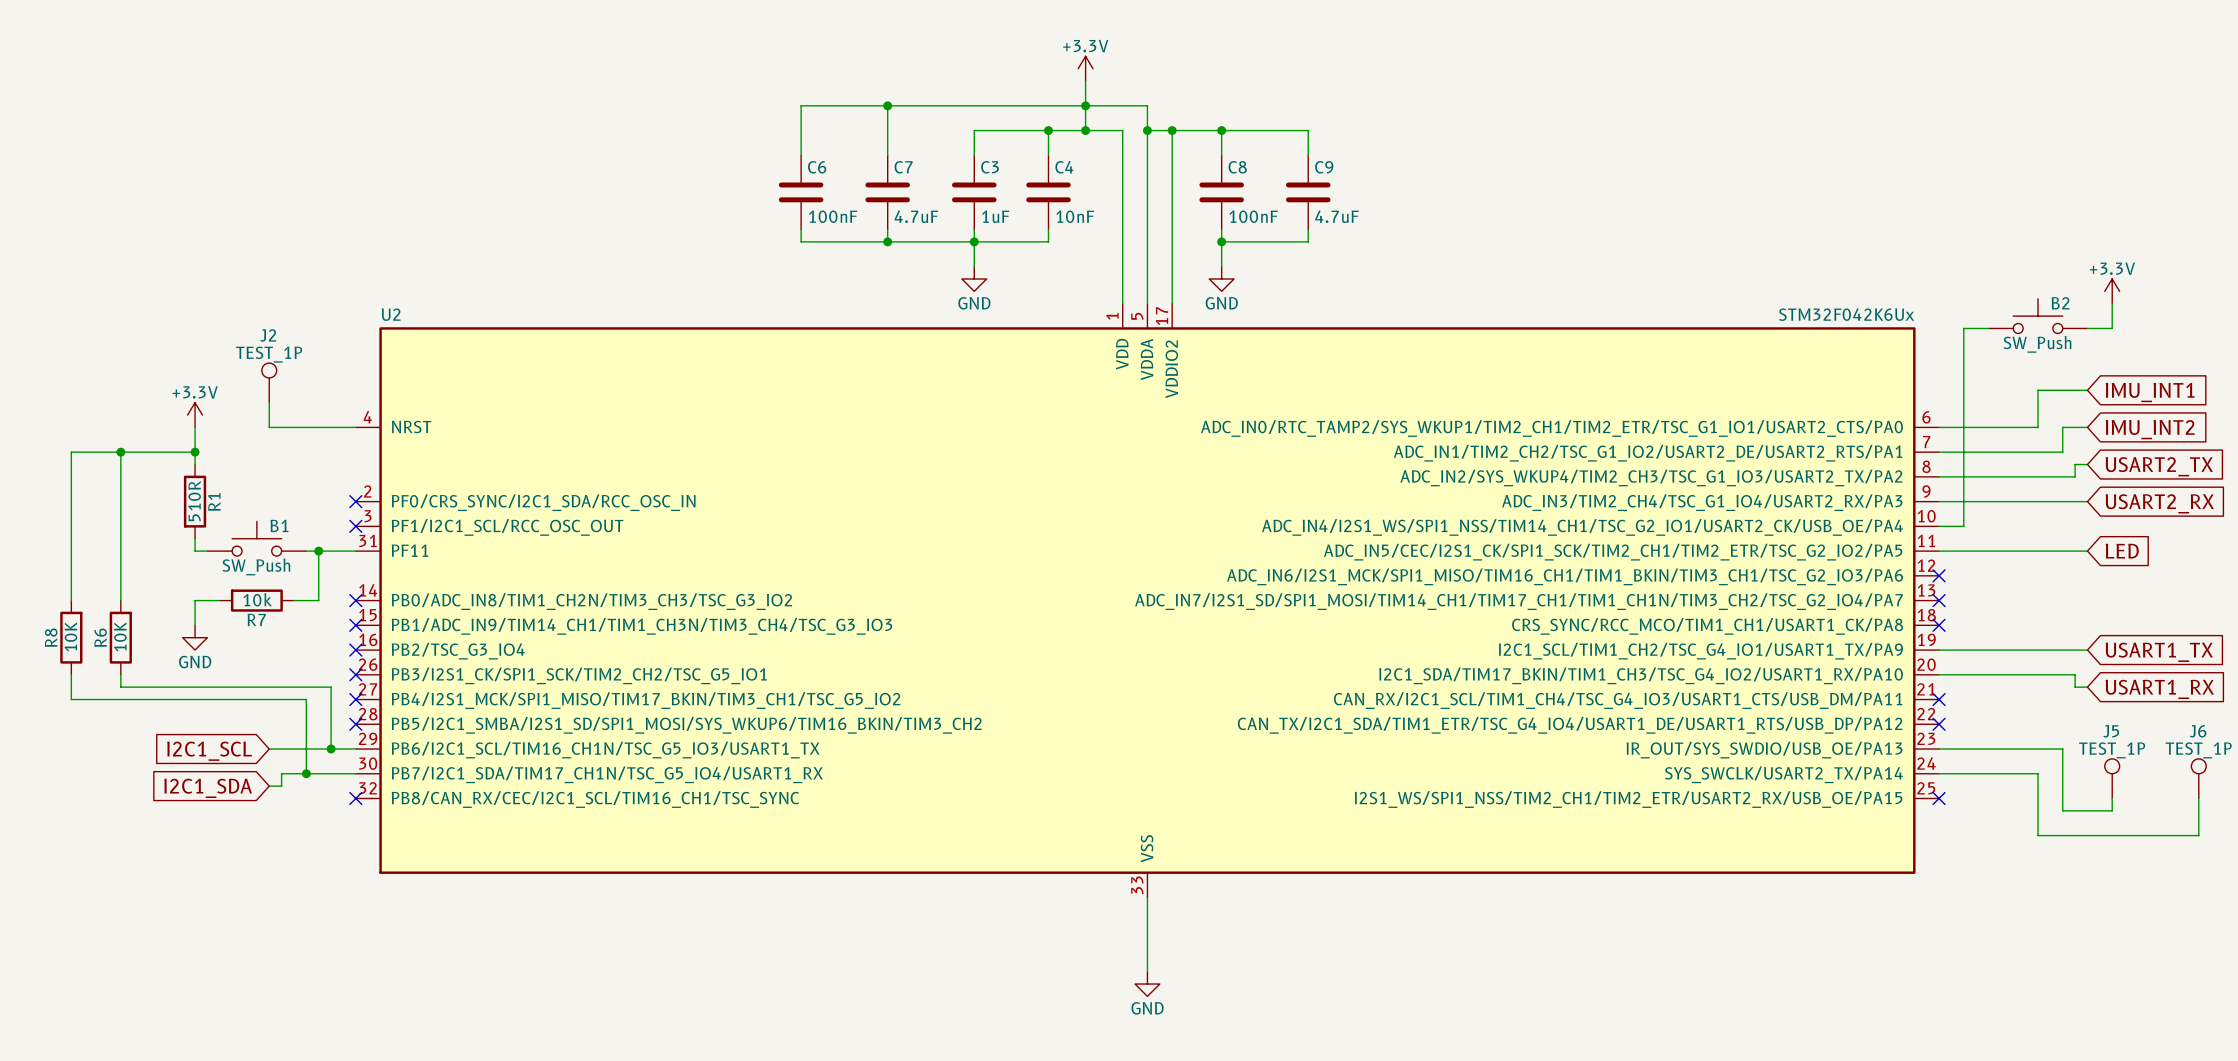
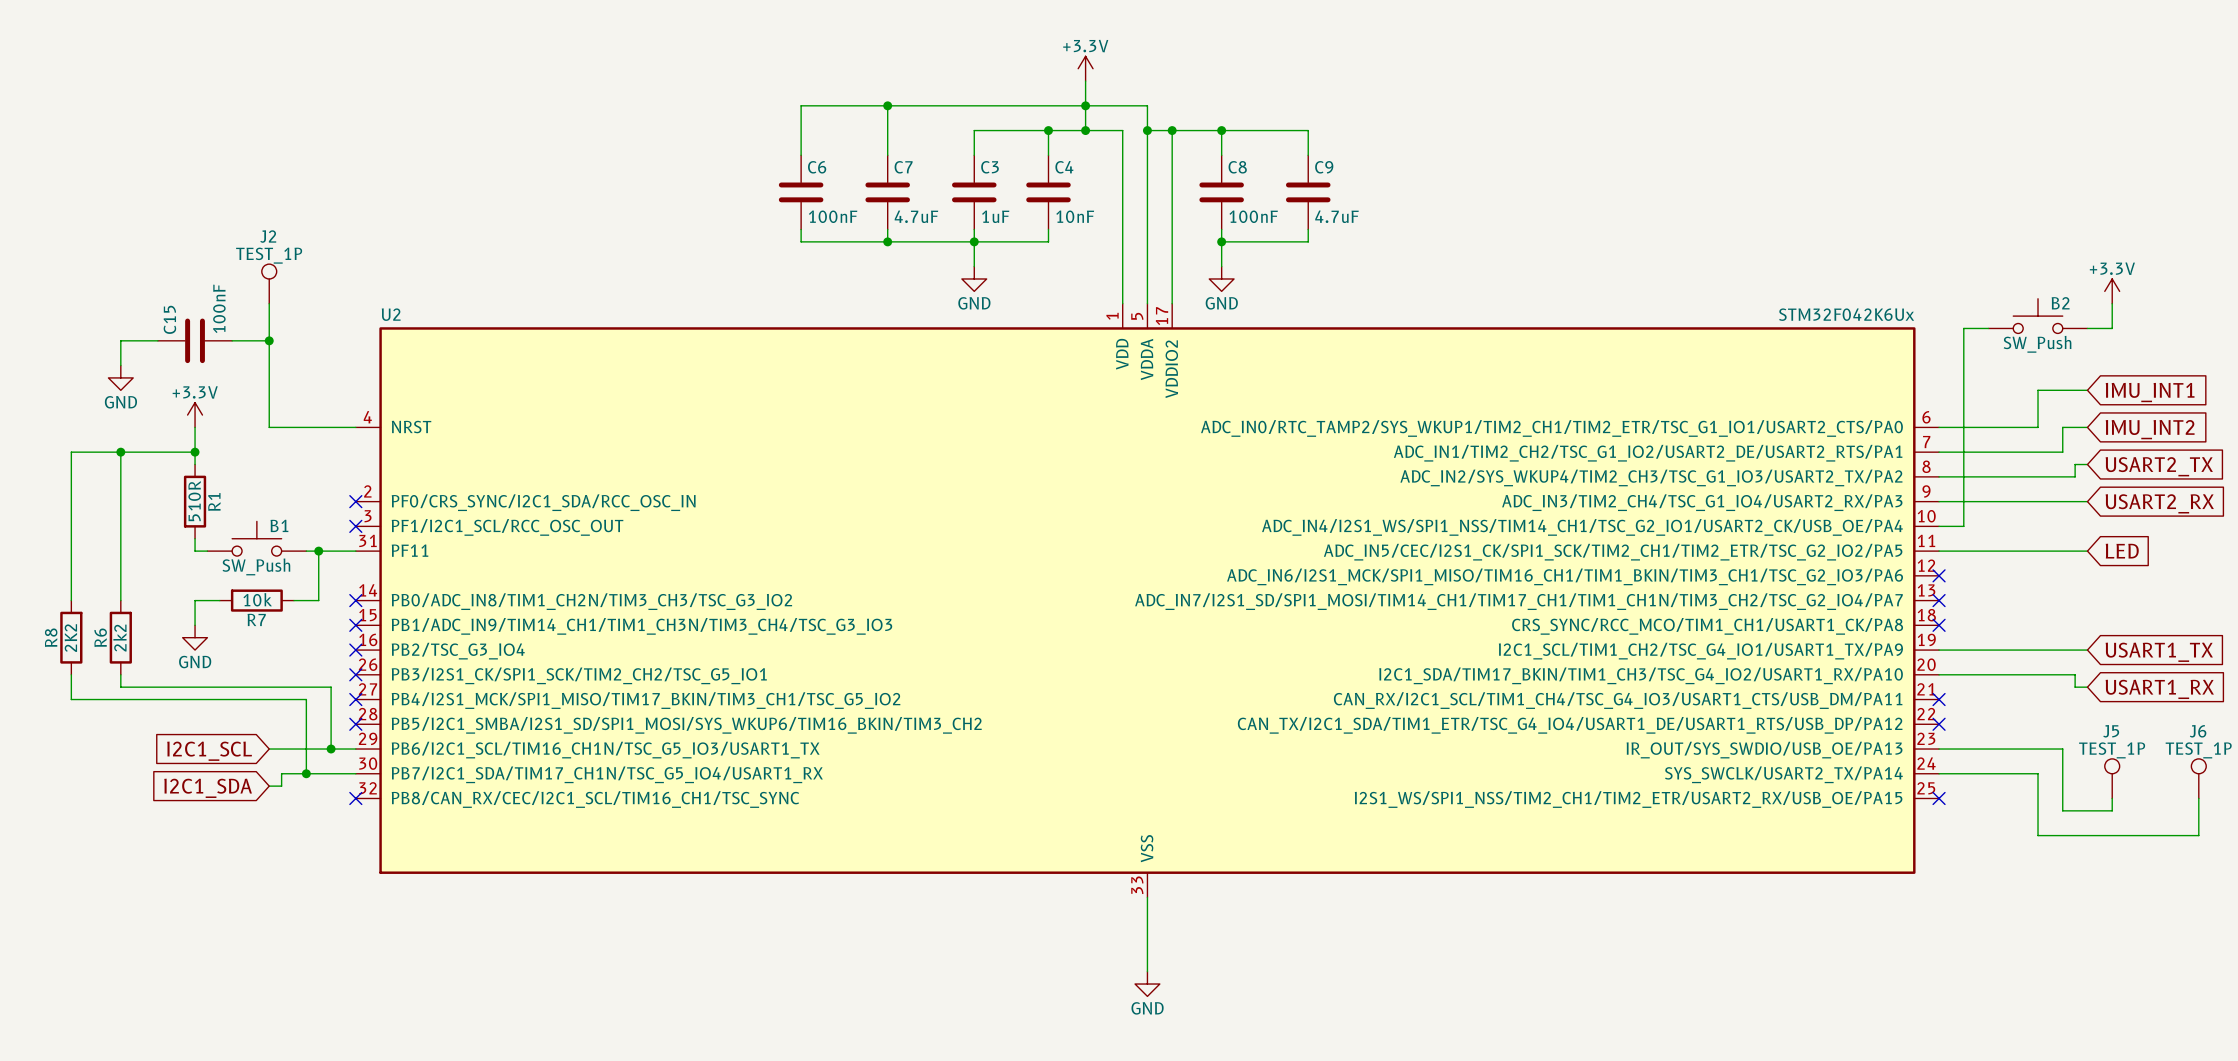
wire: none -> (269, 303) (269, 402)
wire: none -> (157, 340) (120, 340) (120, 365)
C15: none -> 100nF (195, 340)
wire: none -> (232, 340) (269, 340)
junction: none -> (269, 340)
power symbol: none -> GND (120, 377)
J2 position: (269, 382) -> (269, 283)
R8 value: 10K (70, 636) -> 2K2 (70, 638)
R6 value: 10K (120, 636) -> 2k2 (119, 638)

